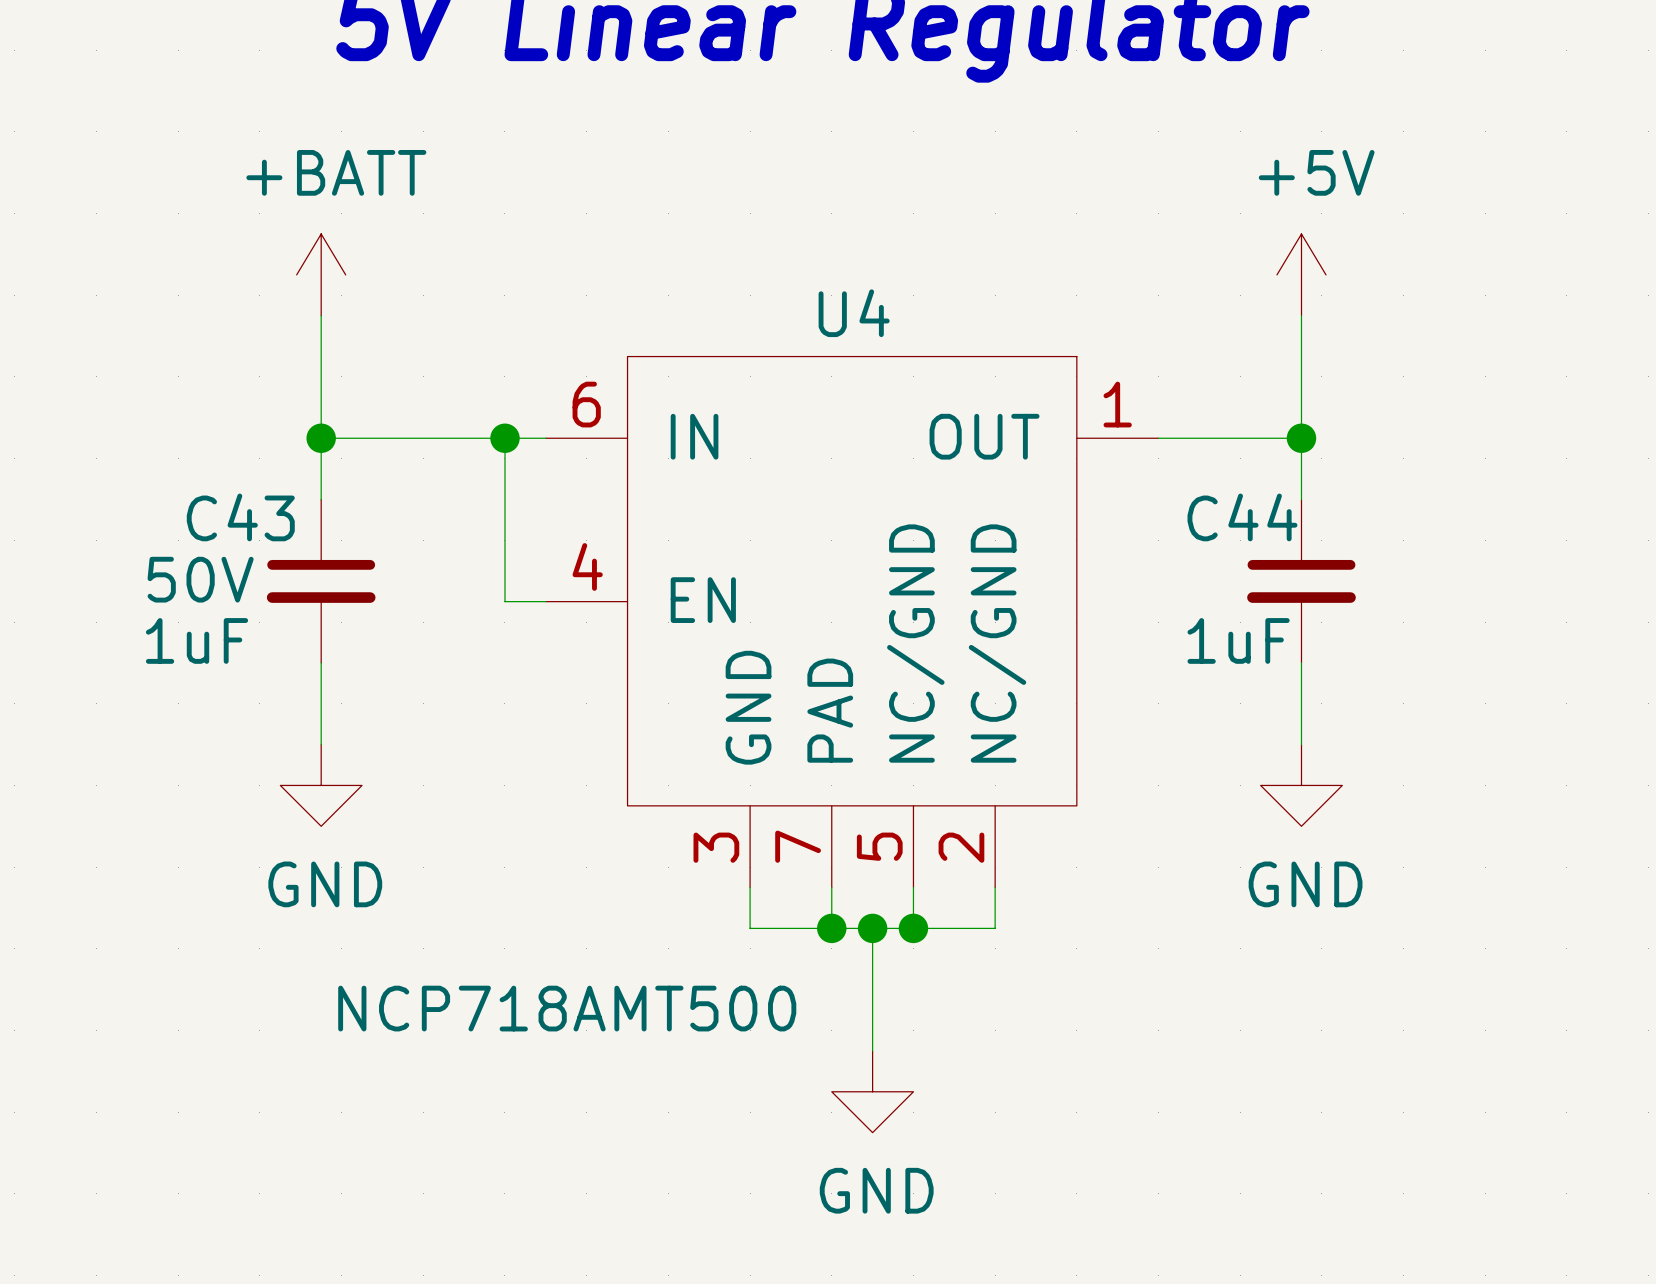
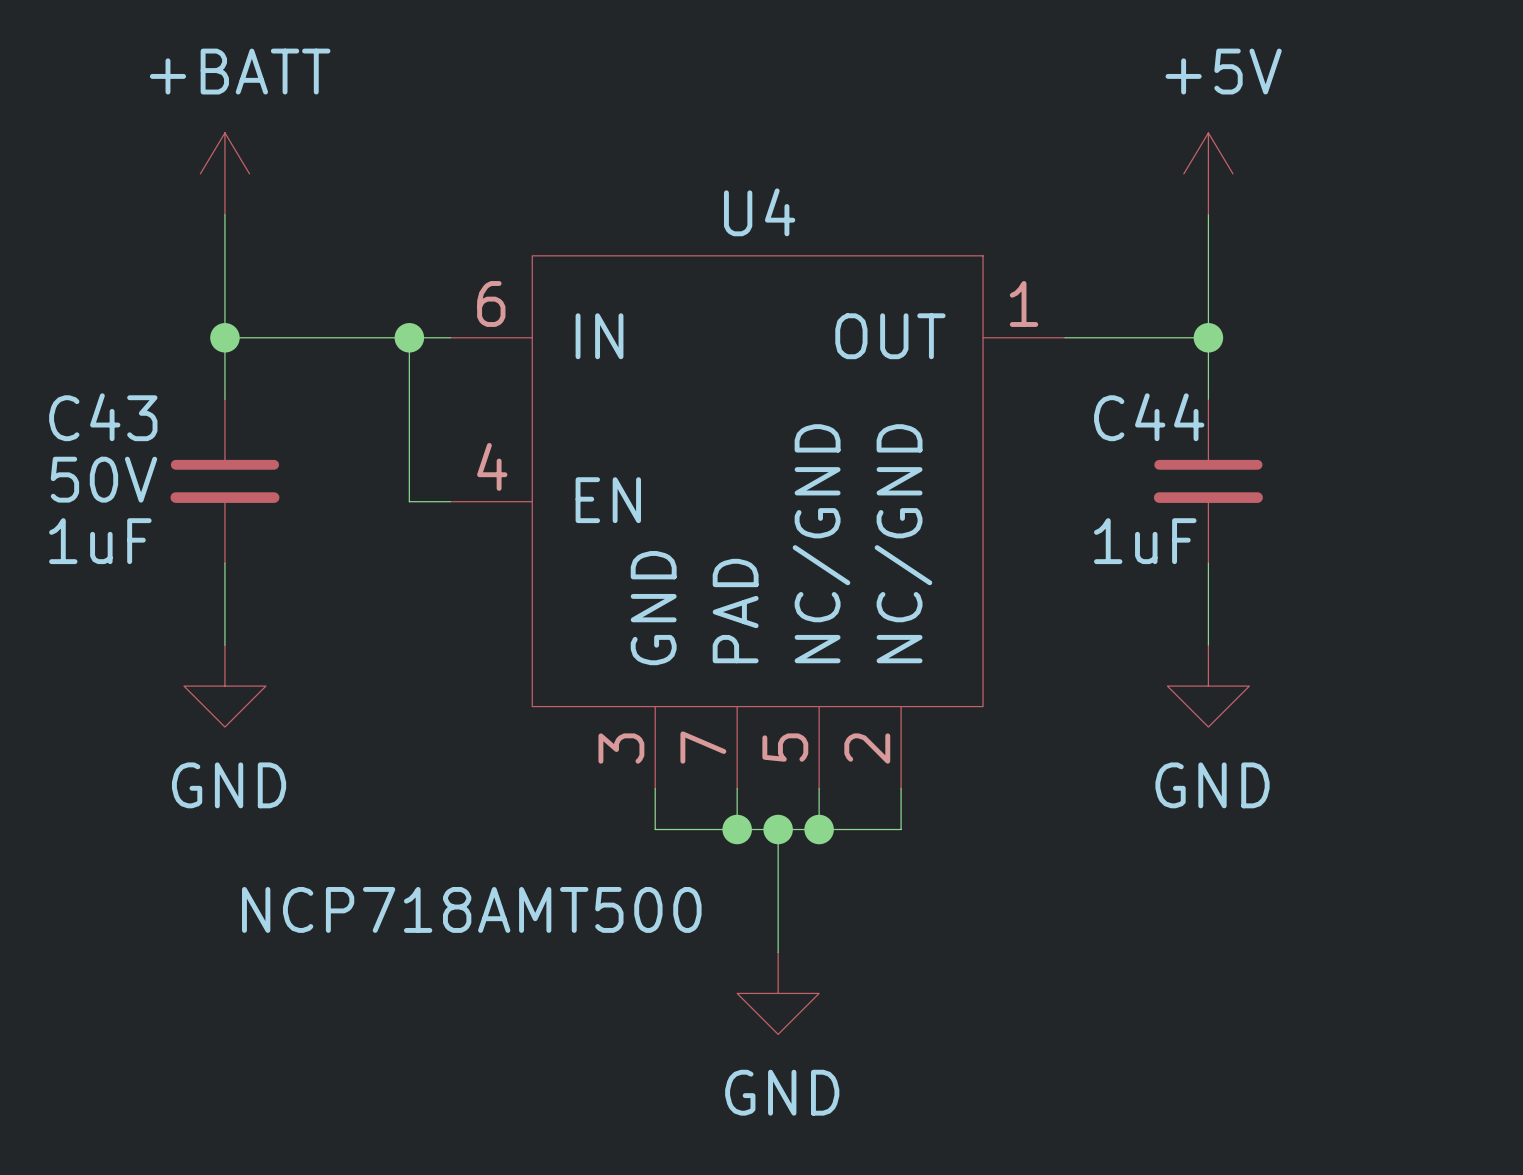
C43 name position: C43 (240, 517) -> C43 (103, 417)

